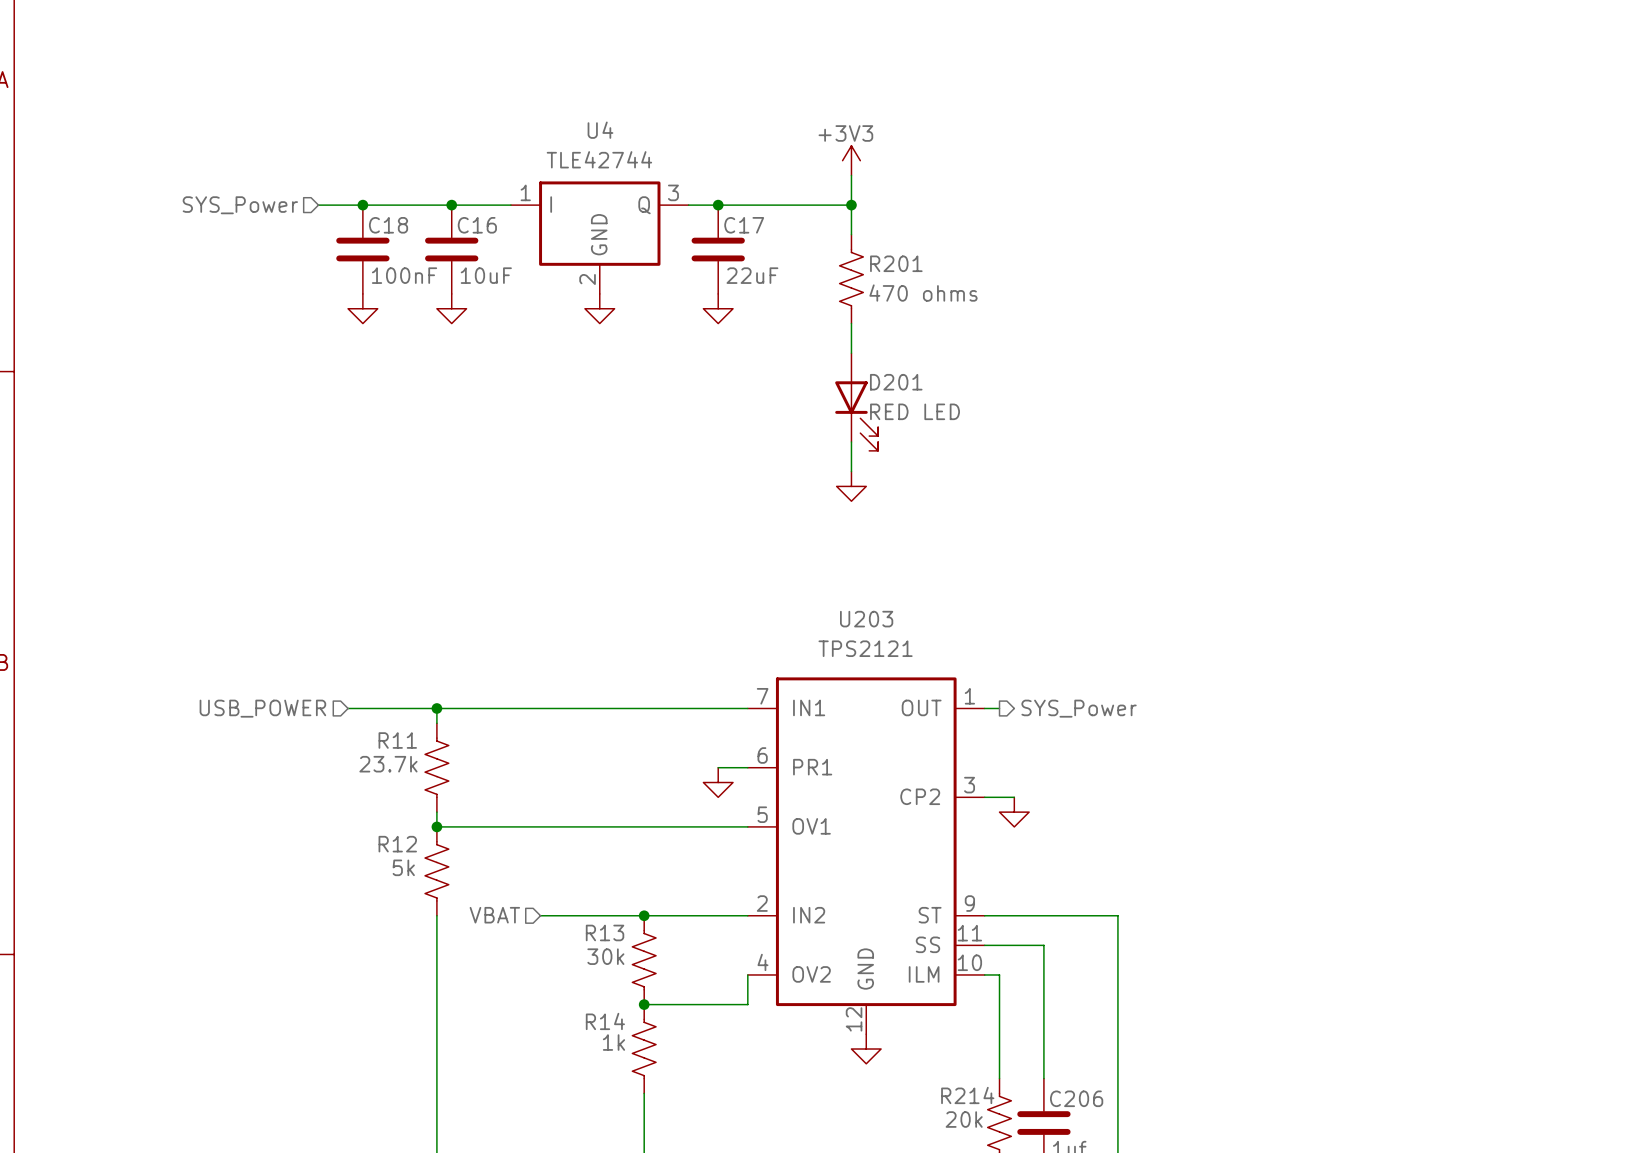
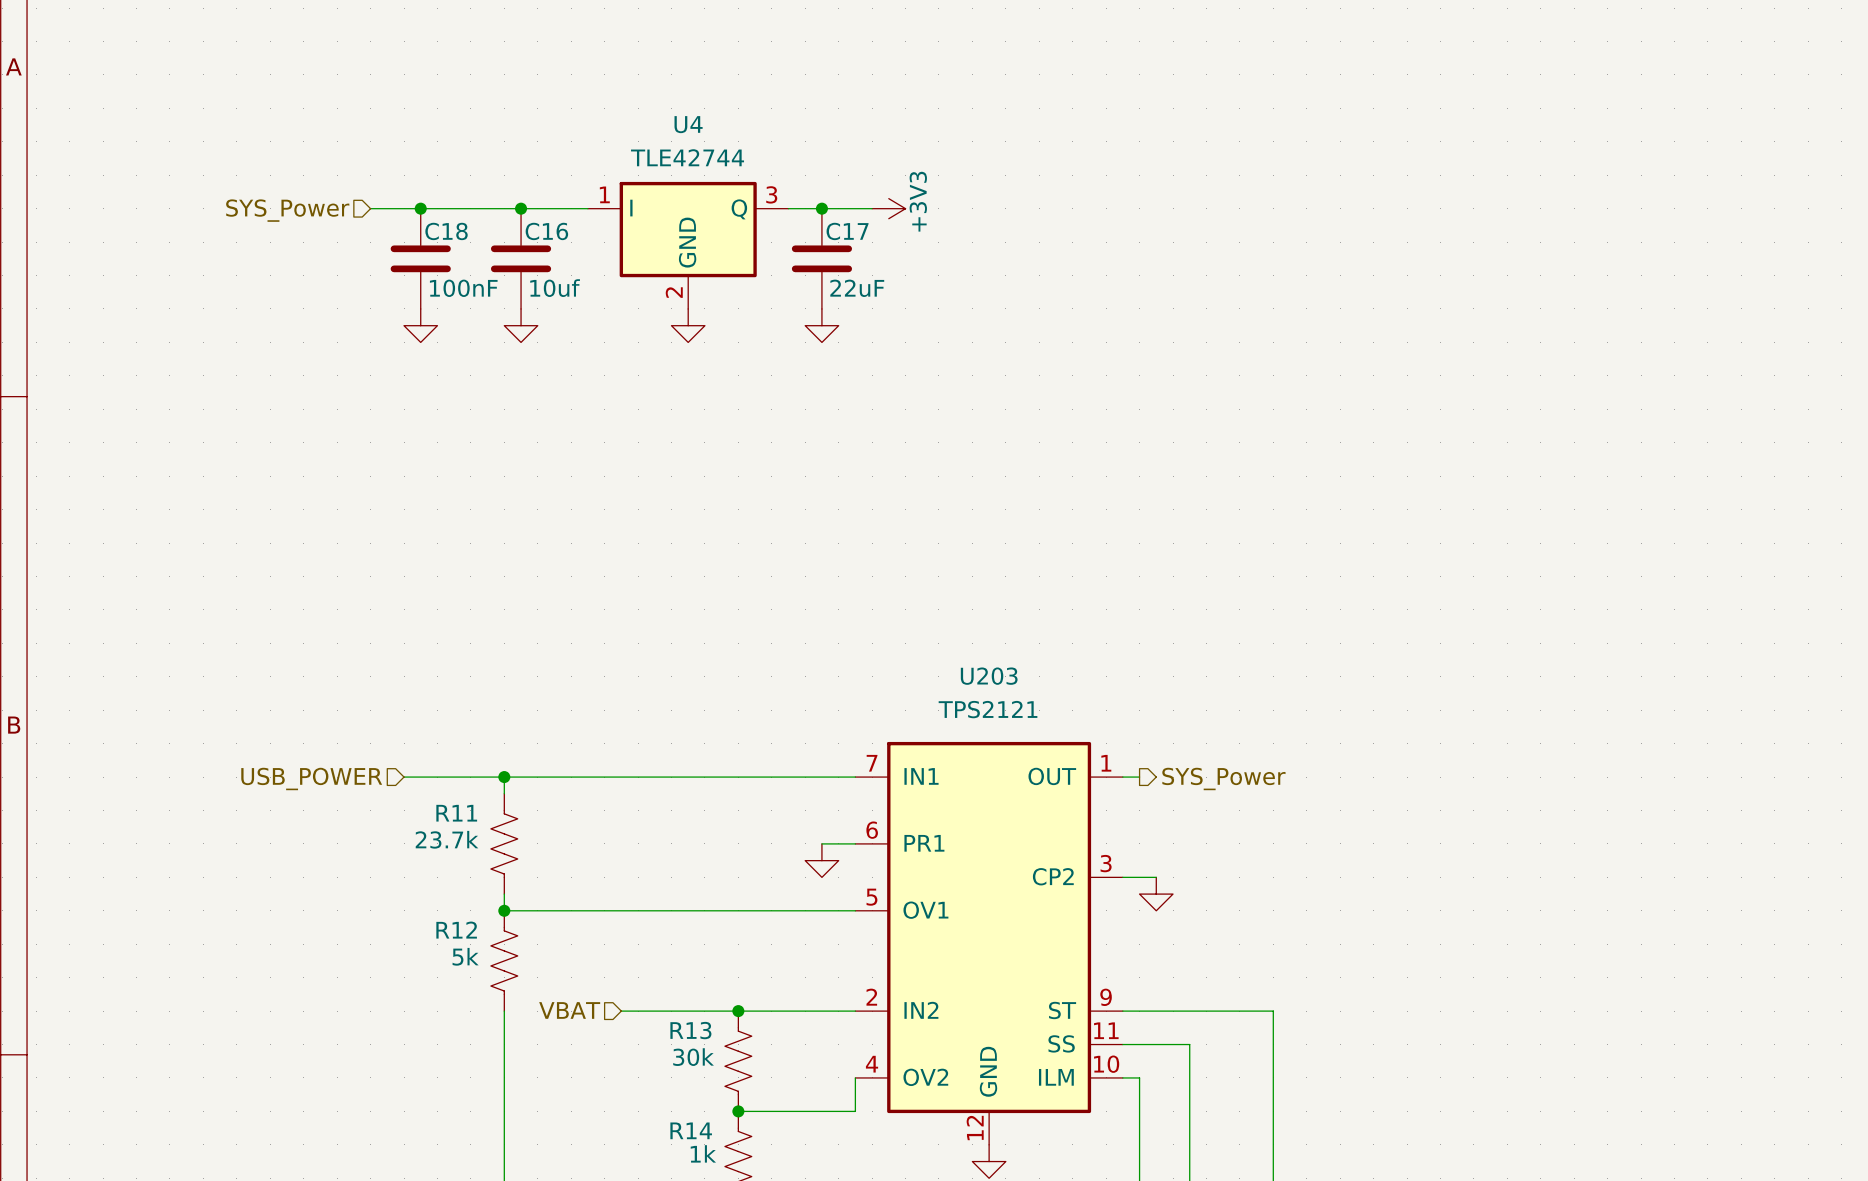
power symbol rotation: 0° (851, 160) -> 90° clockwise (888, 208)
power symbol position: +3V3 (851, 160) -> +3V3 (888, 208)
wire: (851, 175) (851, 234) -> none
wire: (762, 205) (851, 205) -> none
junction: (851, 205) -> none
C16 value: 10uF (486, 275) -> 10uf (555, 288)
R201: 470 ohms (851, 279) -> none
wire: (851, 323) (851, 353) -> none
D201: RED LED (856, 402) -> none
wire: (851, 441) (851, 471) -> none
power symbol: (851, 486) -> none

